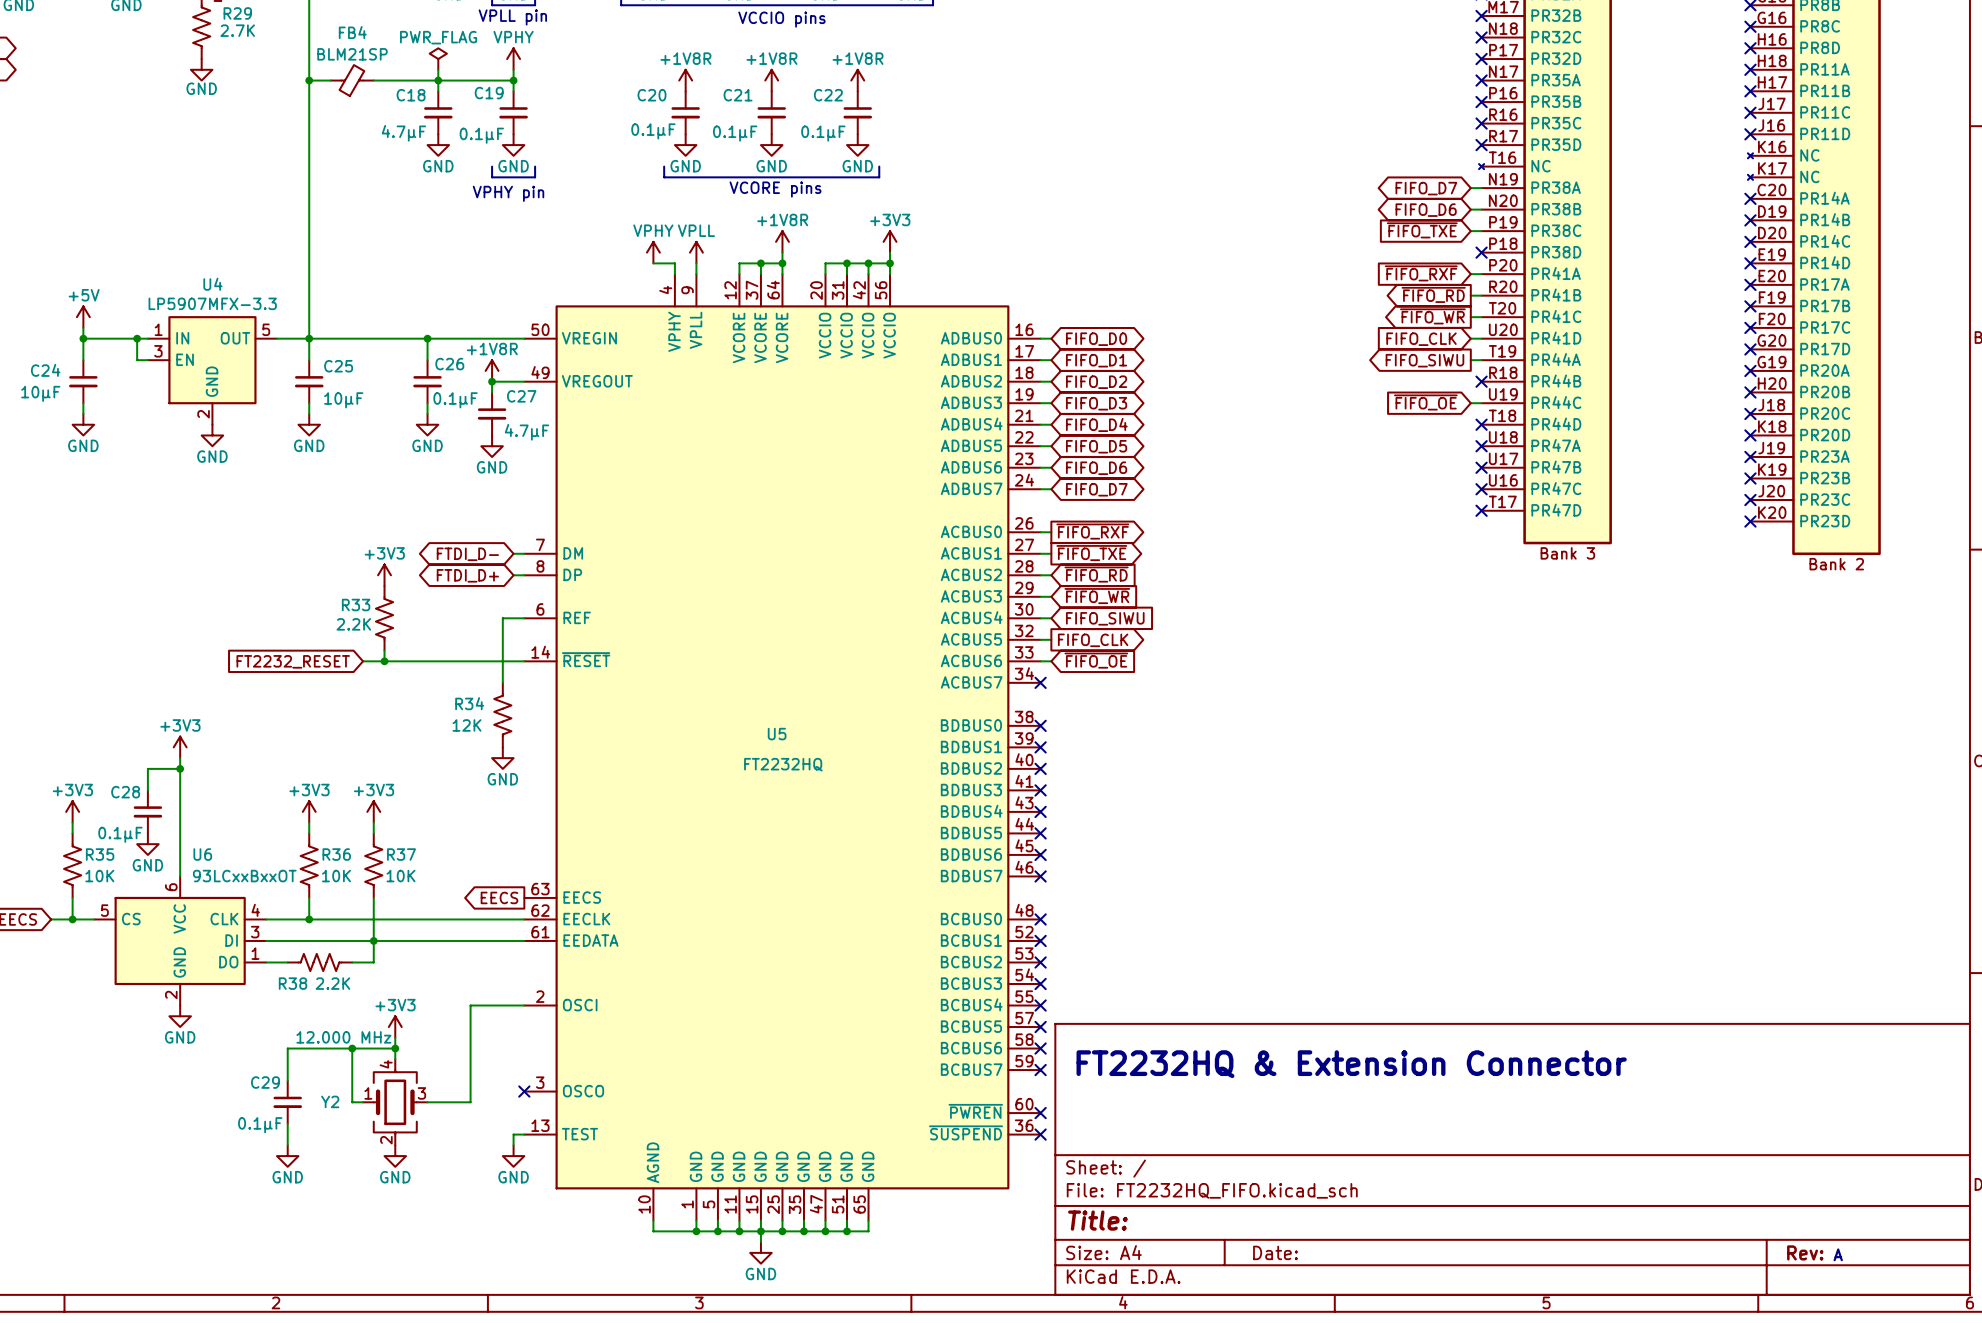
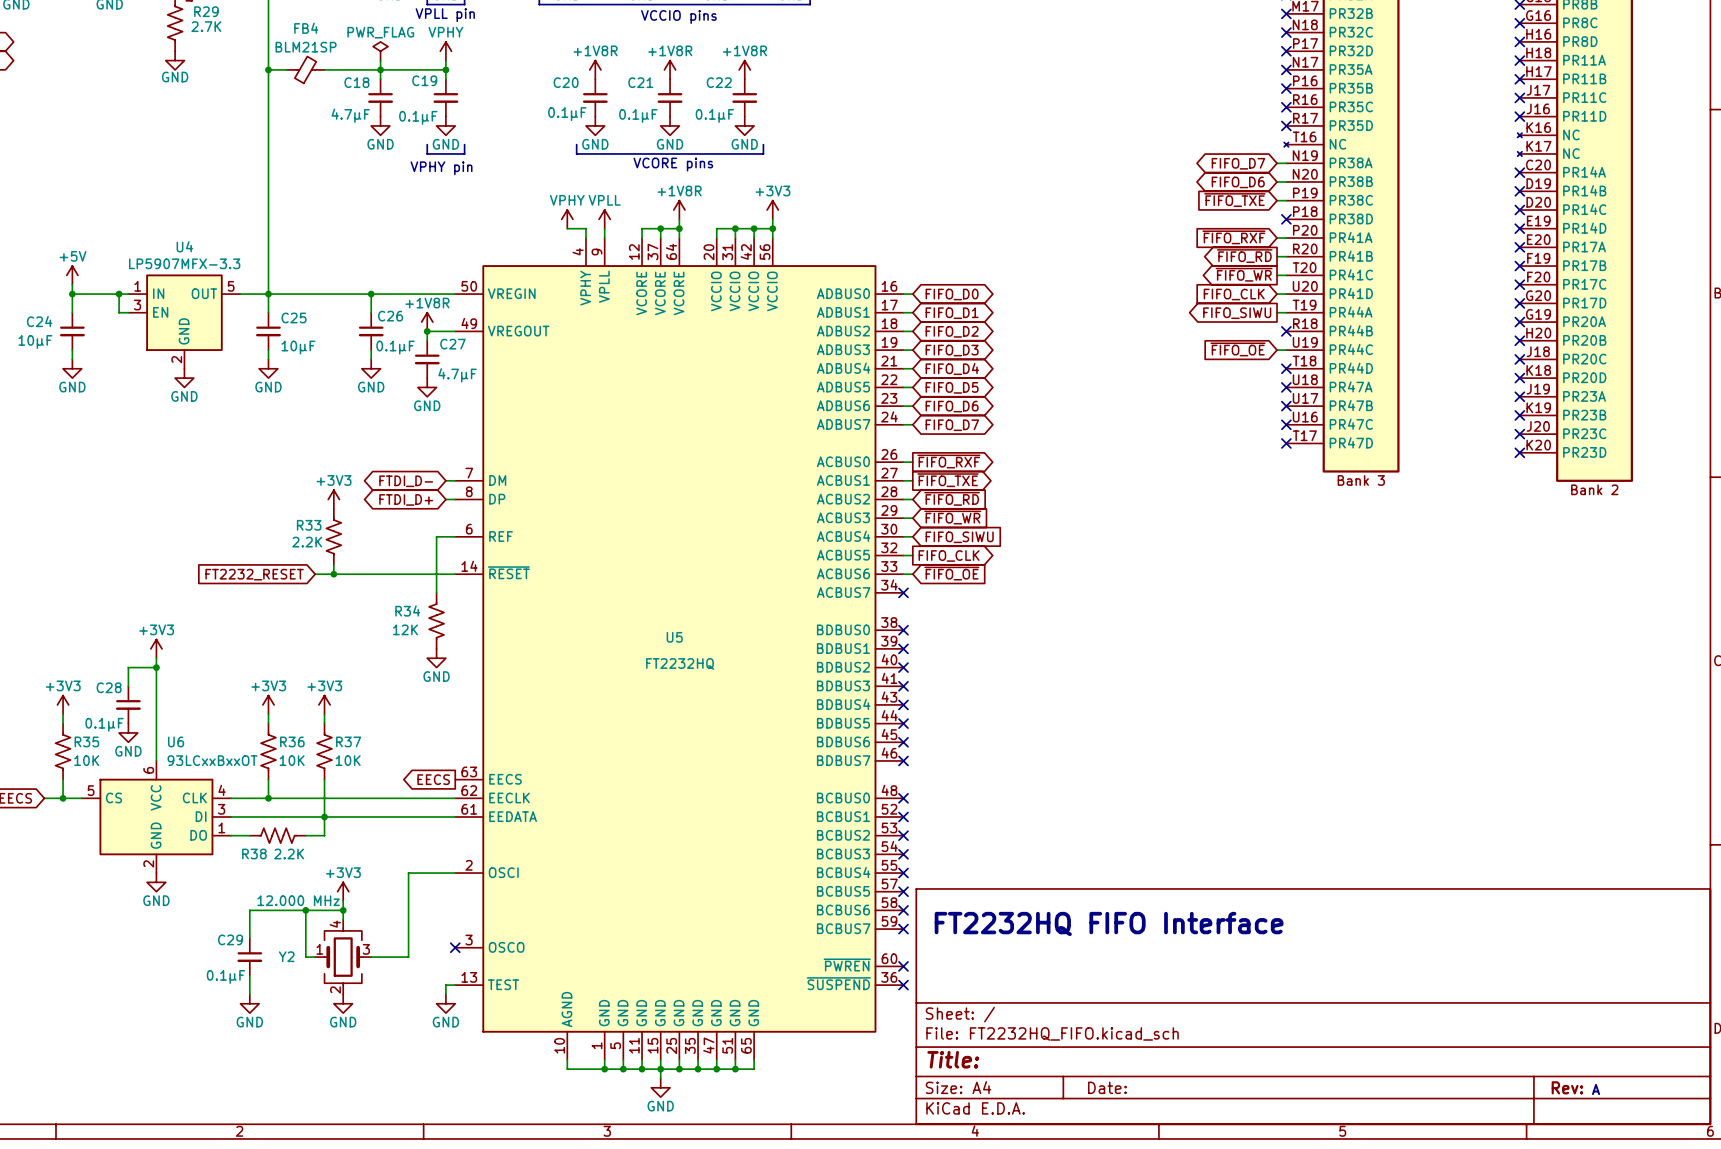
text: FT2232HQ & Extension Connector (1351, 1064) -> FT2232HQ FIFO Interface (1109, 923)

